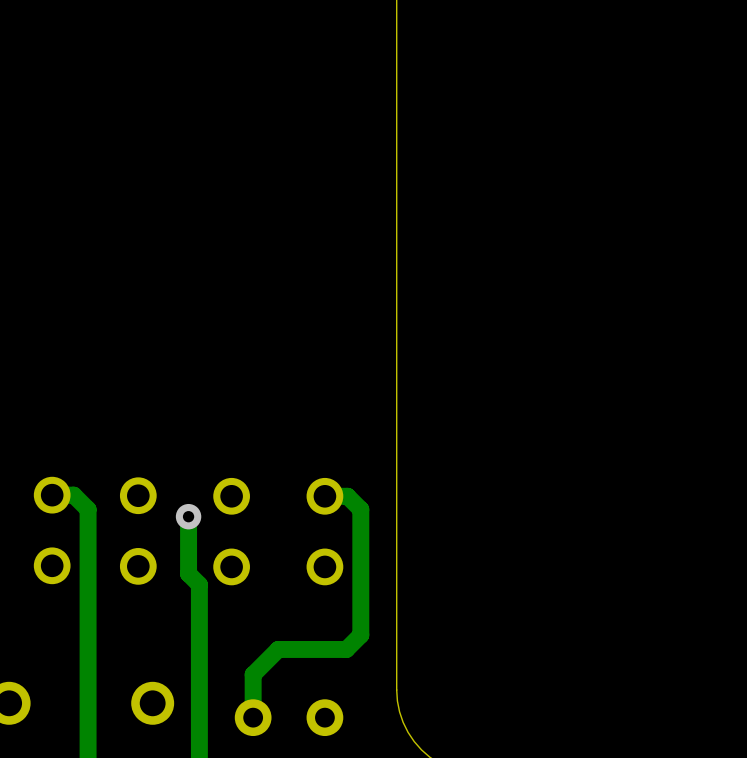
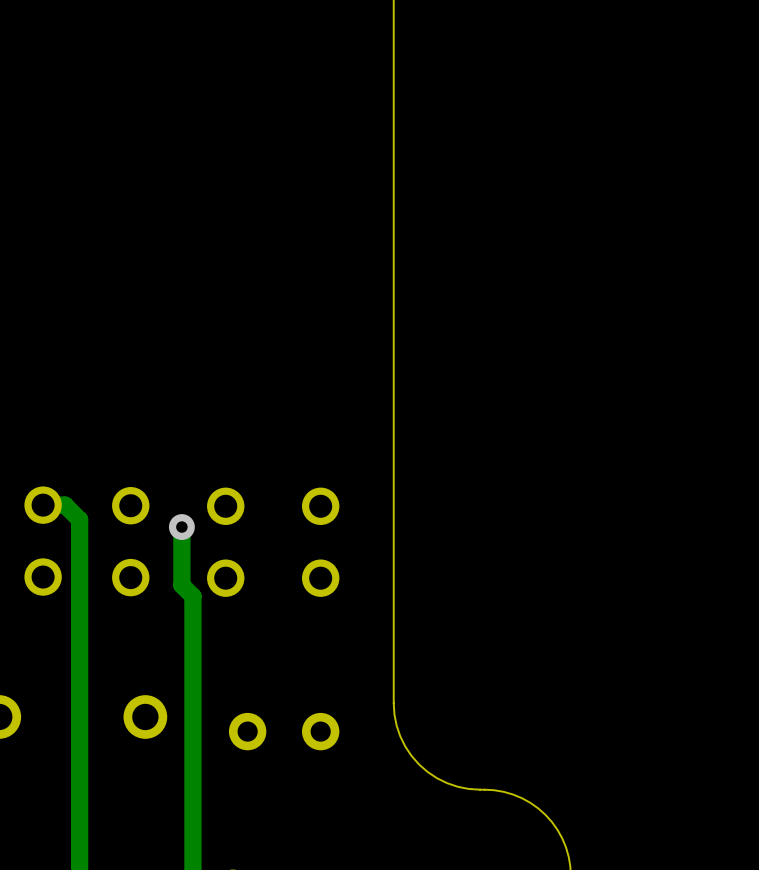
track: (324, 496) (347, 496) (360, 509) (360, 635) (346, 649) (278, 649) (253, 674) (253, 717) -> none

